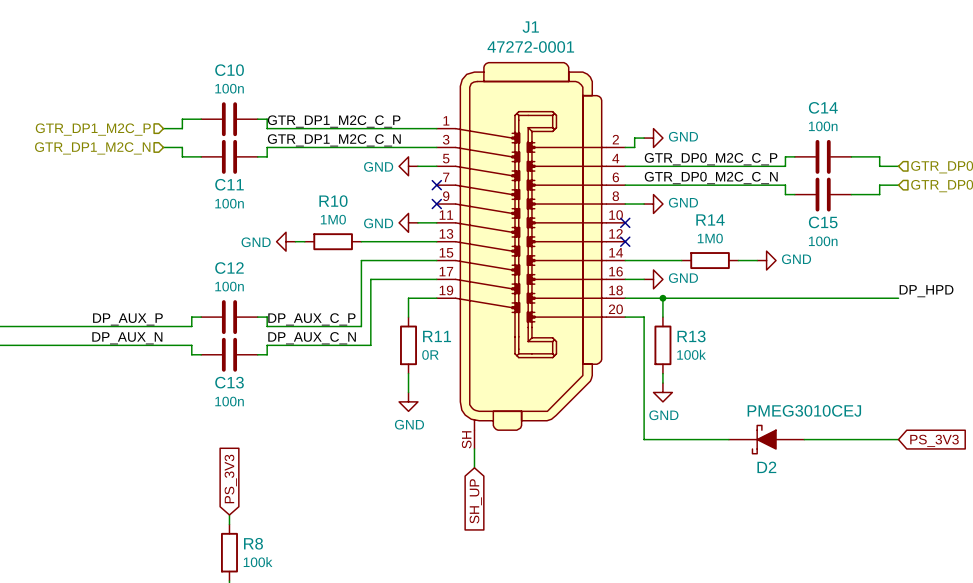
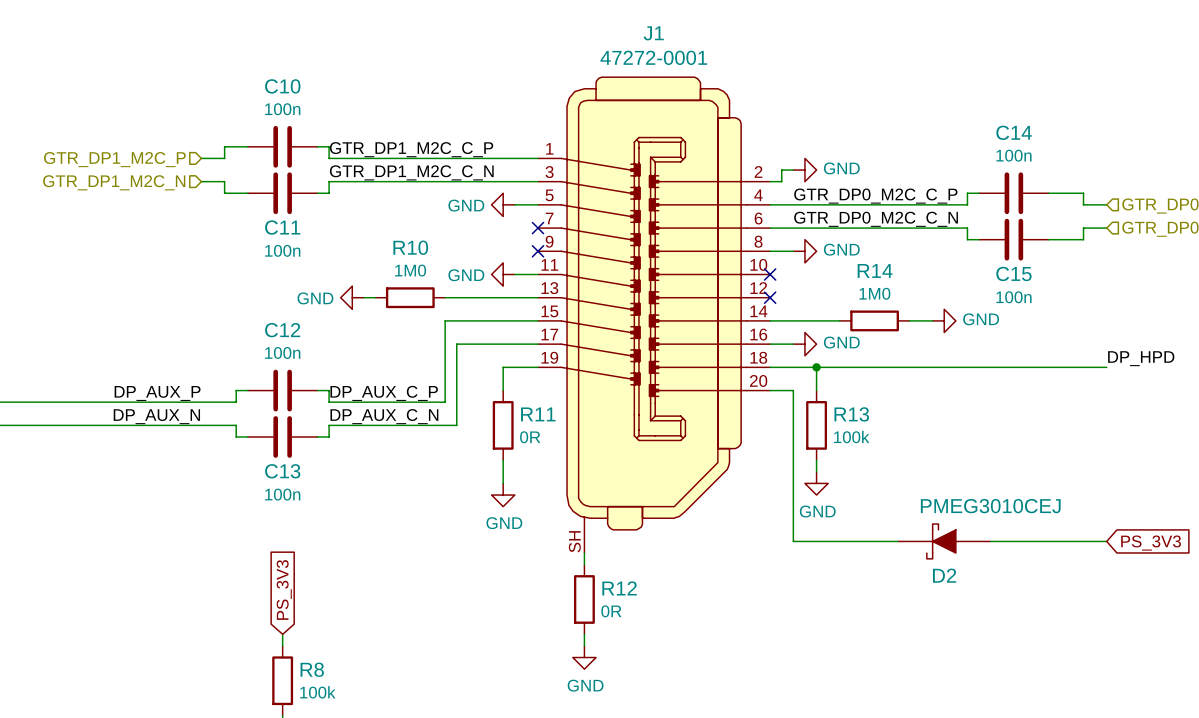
R12: none -> (584, 599)
global label: SH_UP (475, 501) -> none
power symbol: none -> GND (584, 657)

